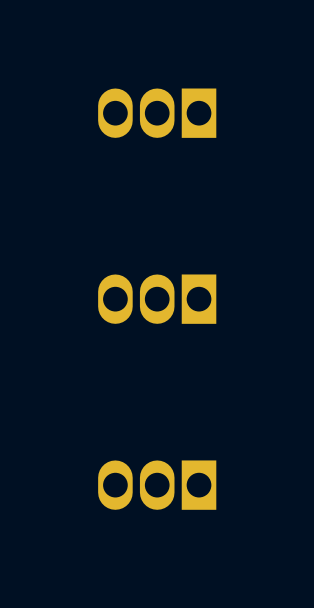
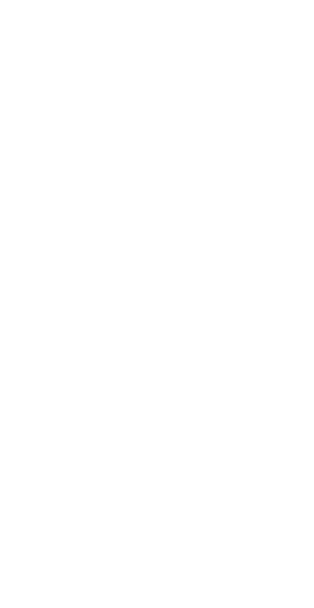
part: (157, 113) -> none
part: (157, 299) -> none
part: (157, 485) -> none

